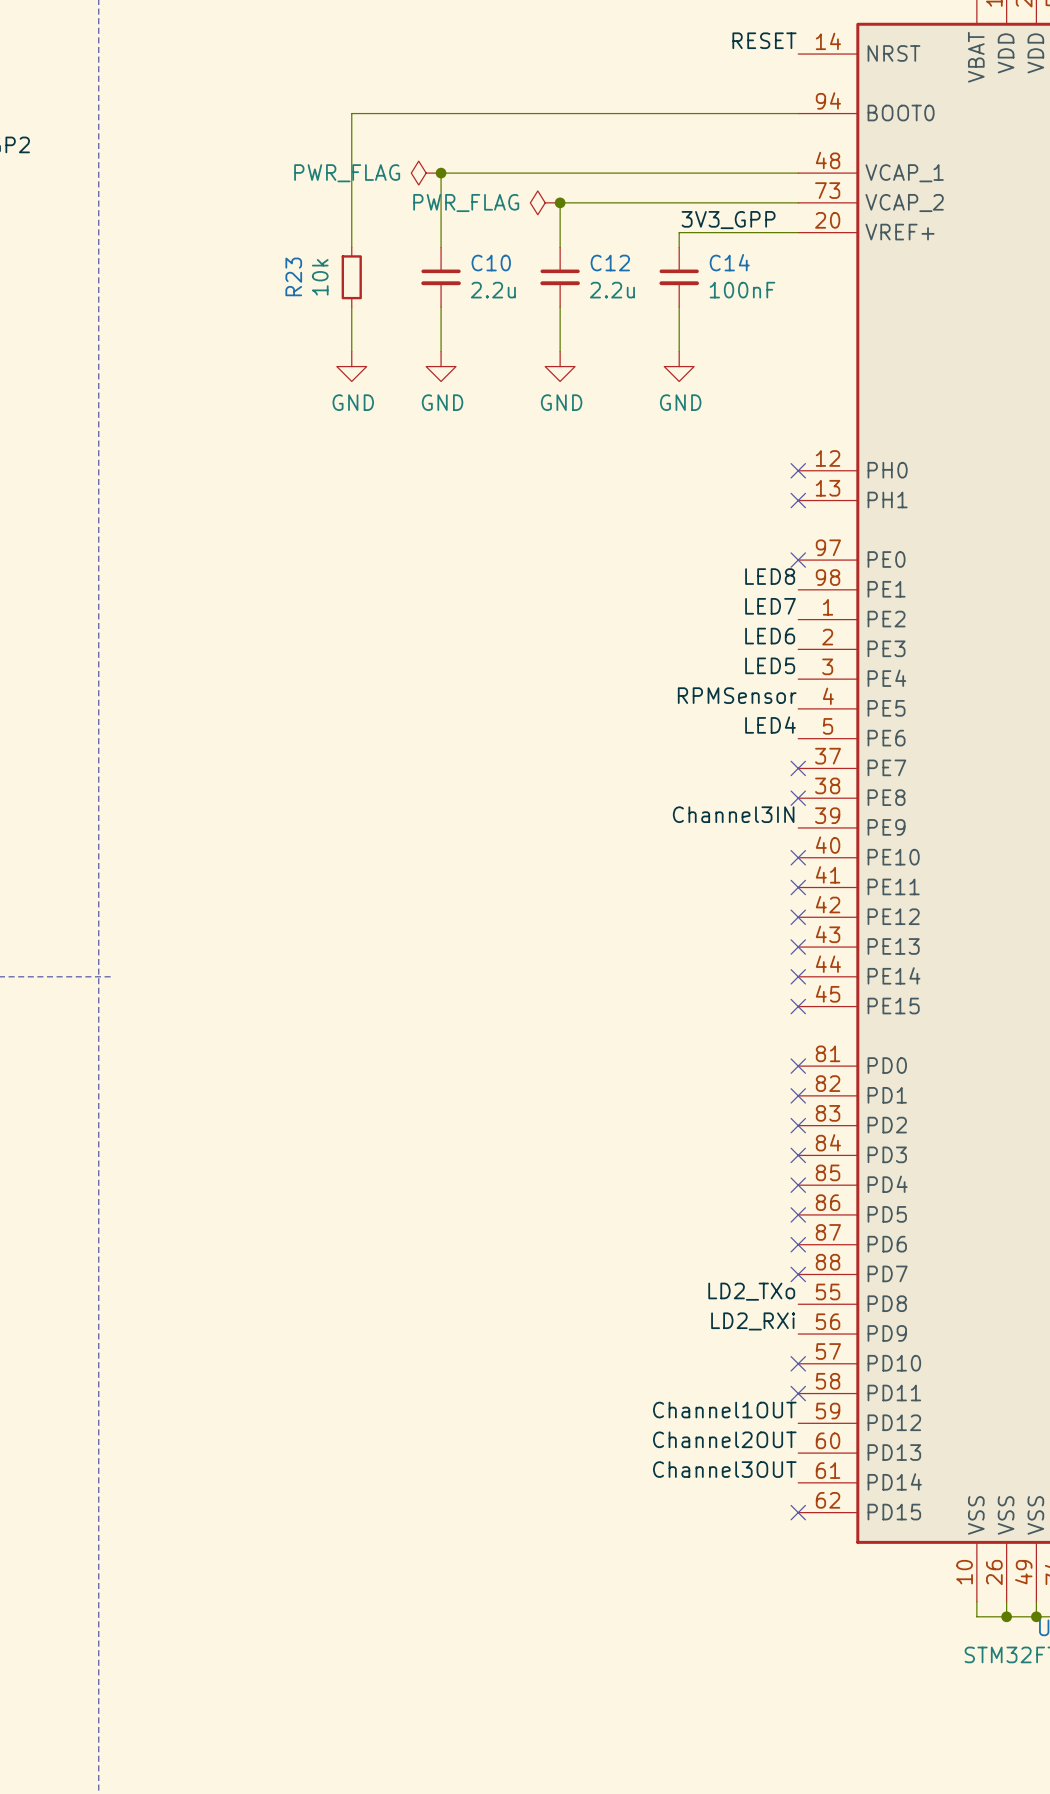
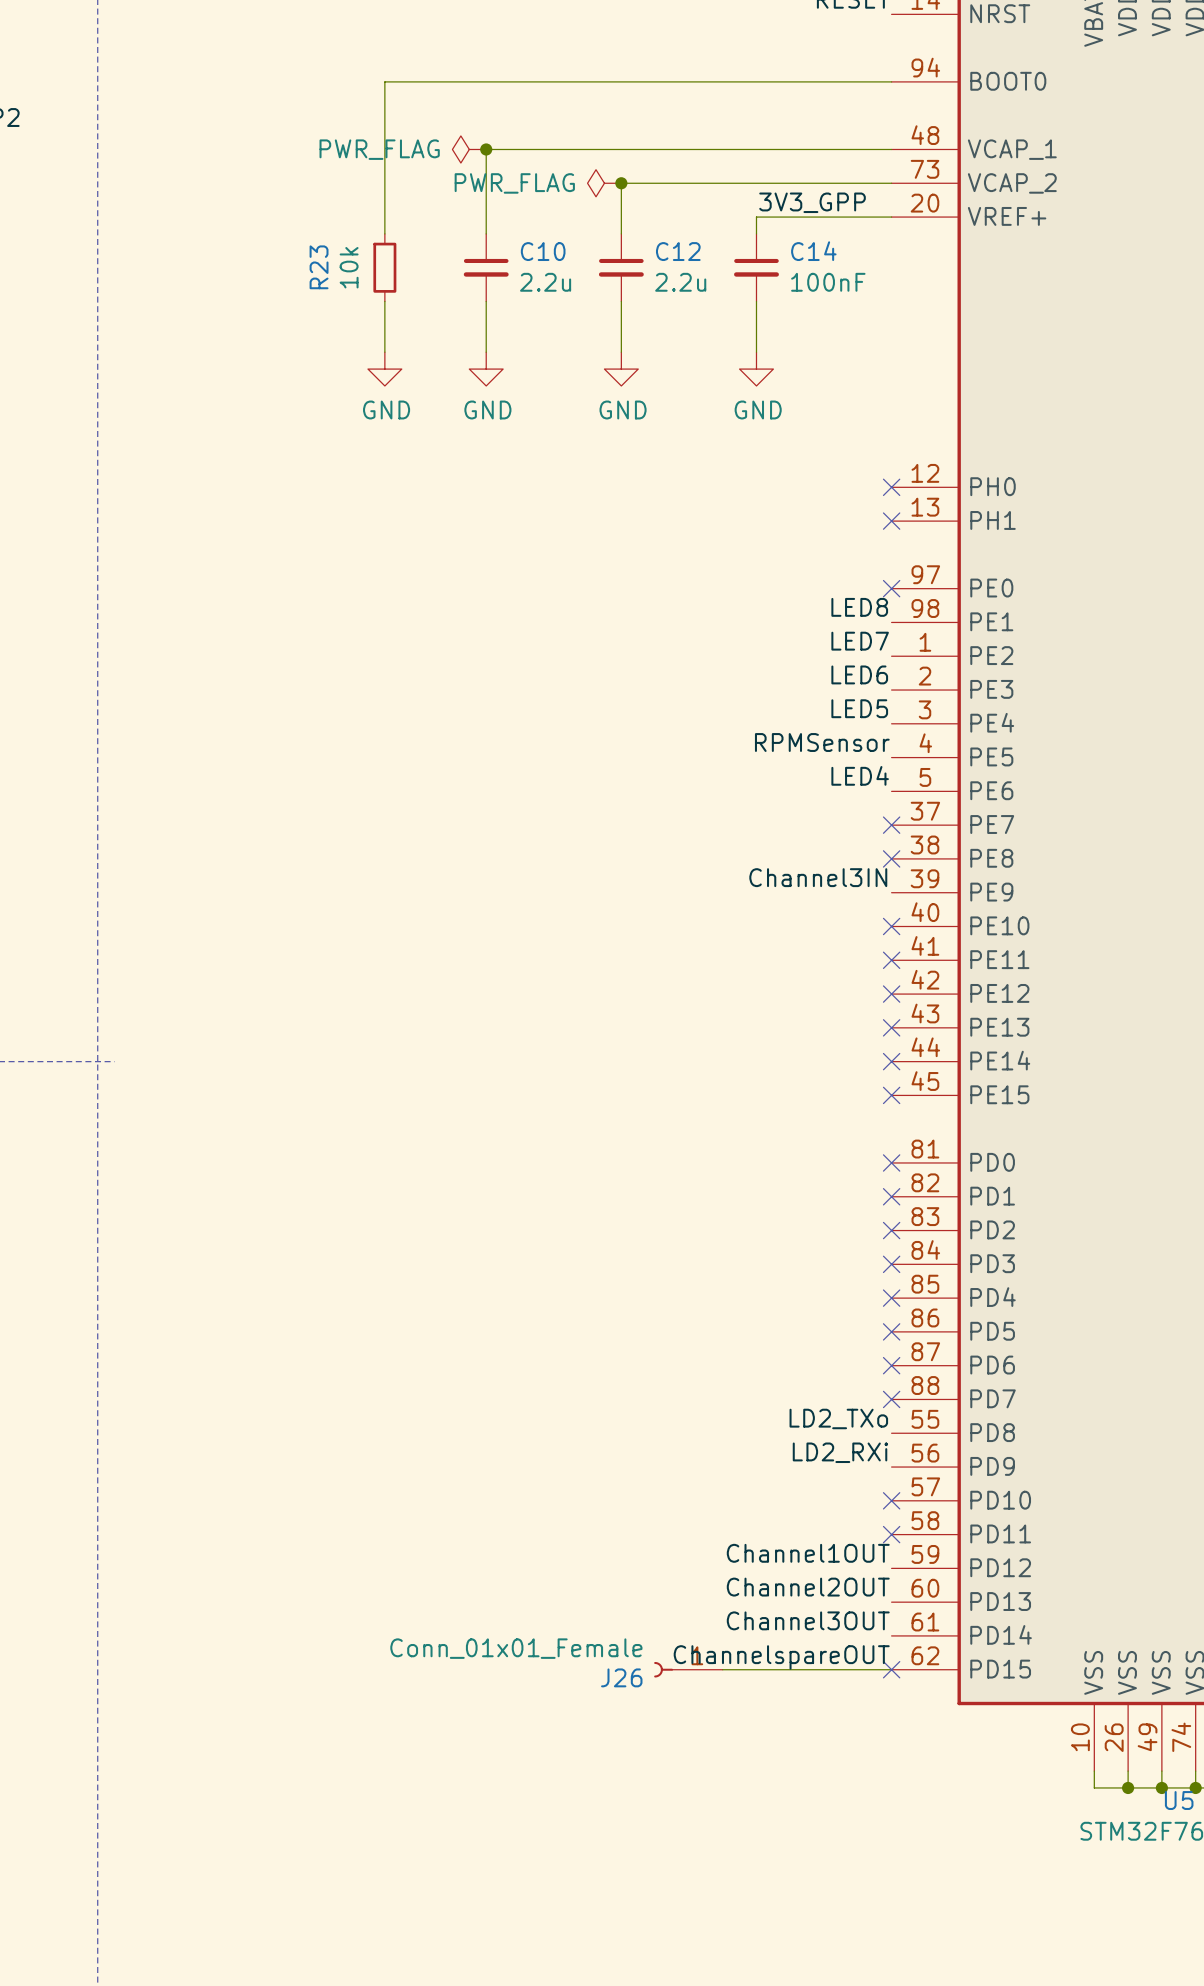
label: none -> ChannelspareOUT (781, 1657)
J26: none -> Conn_01x01_Female (688, 1669)
wire: none -> (722, 1669) (891, 1669)

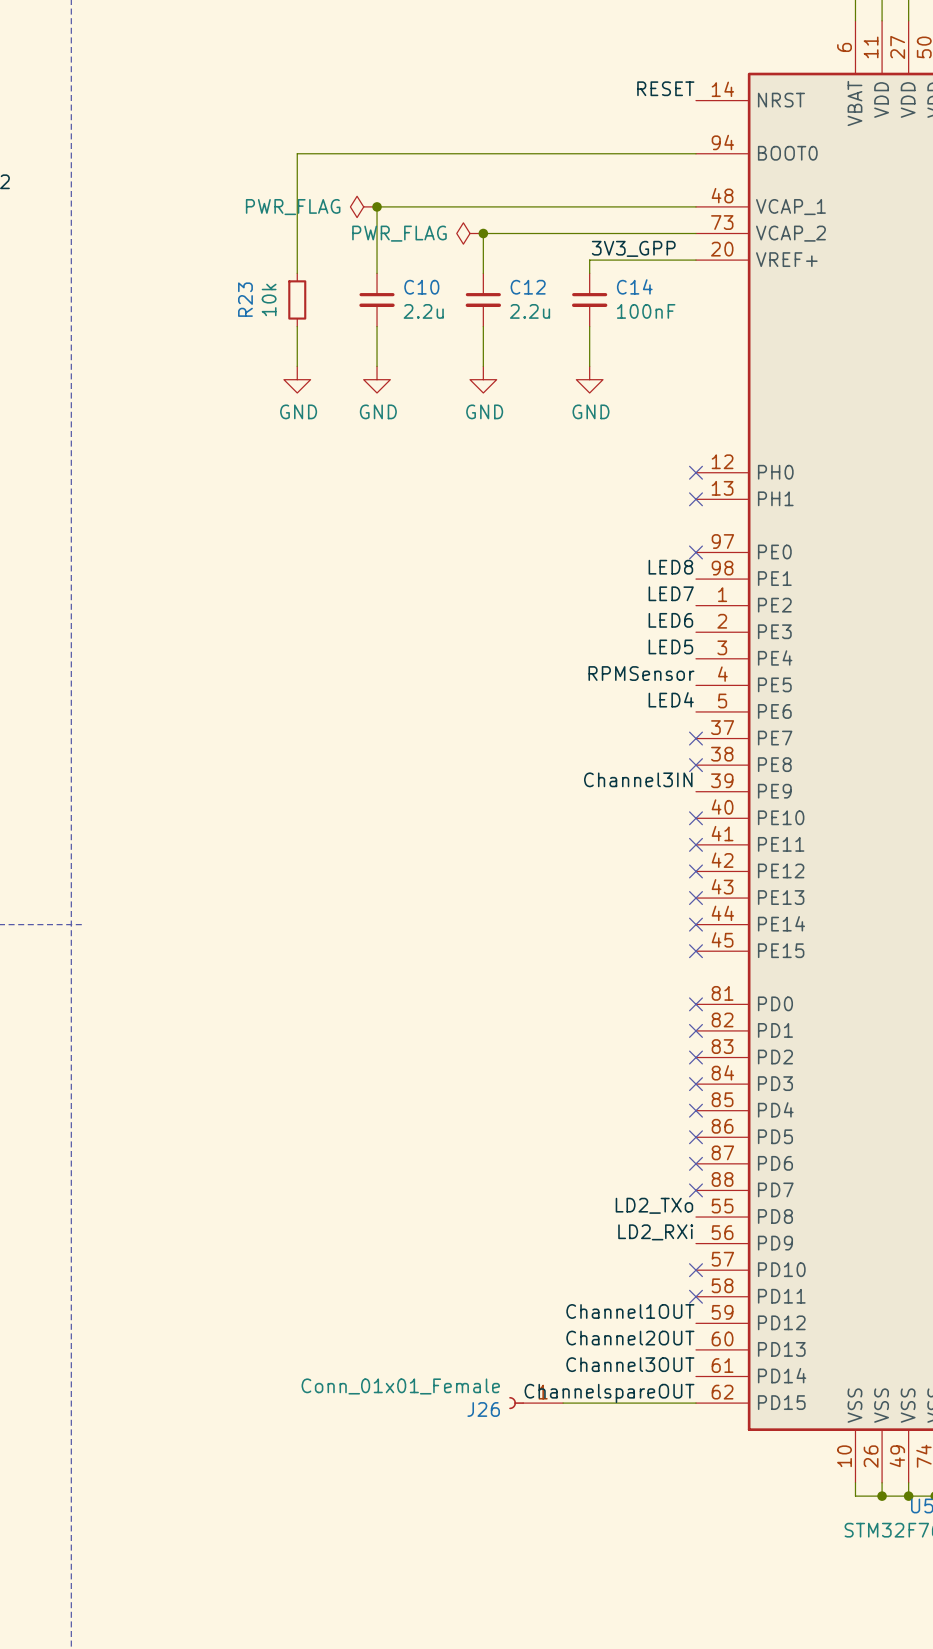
no-connect mark: (891, 1669) -> none

